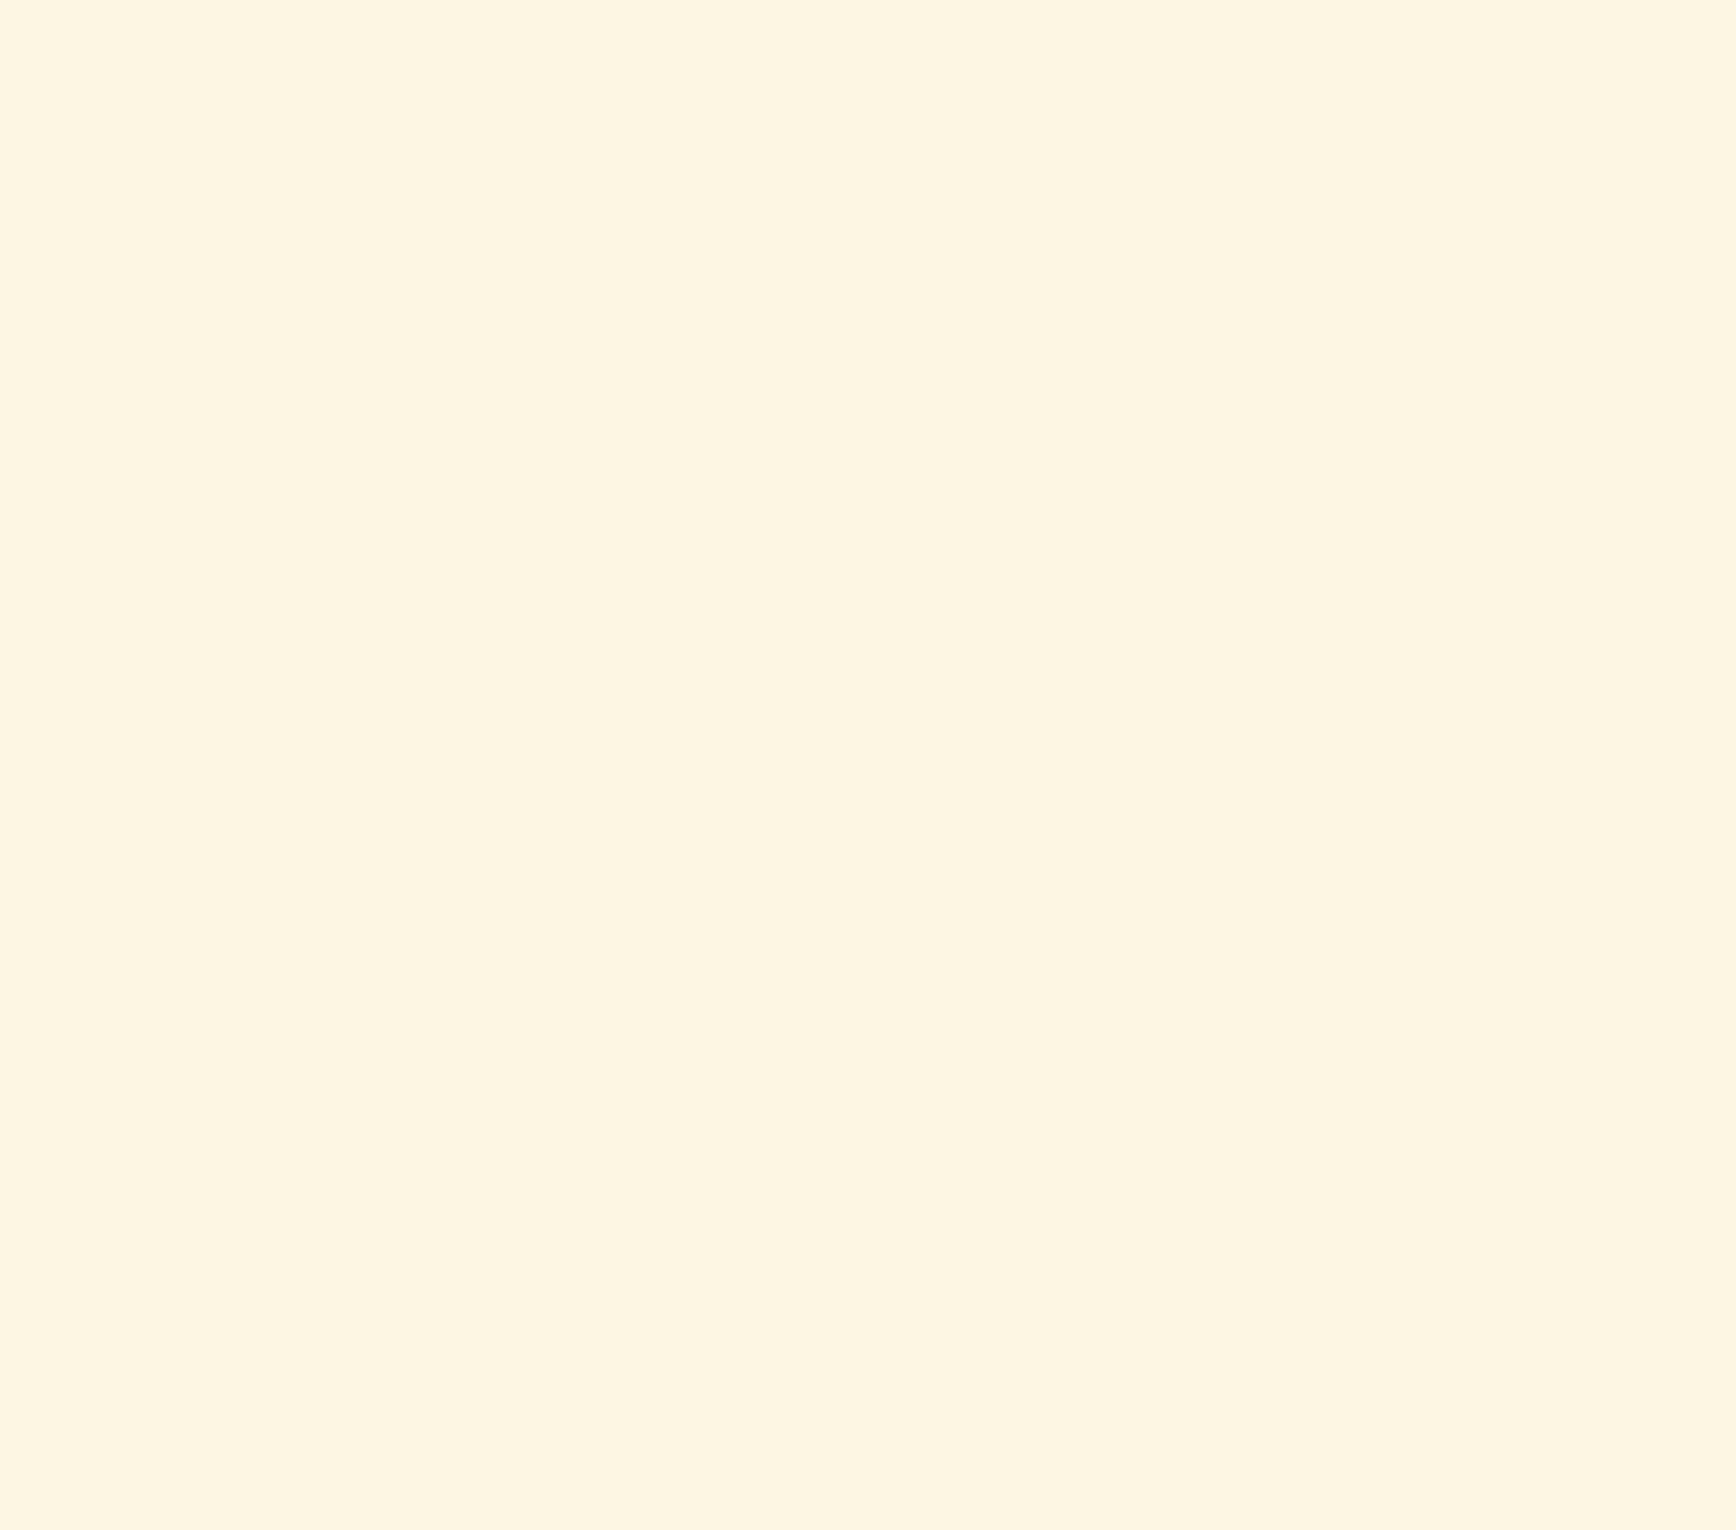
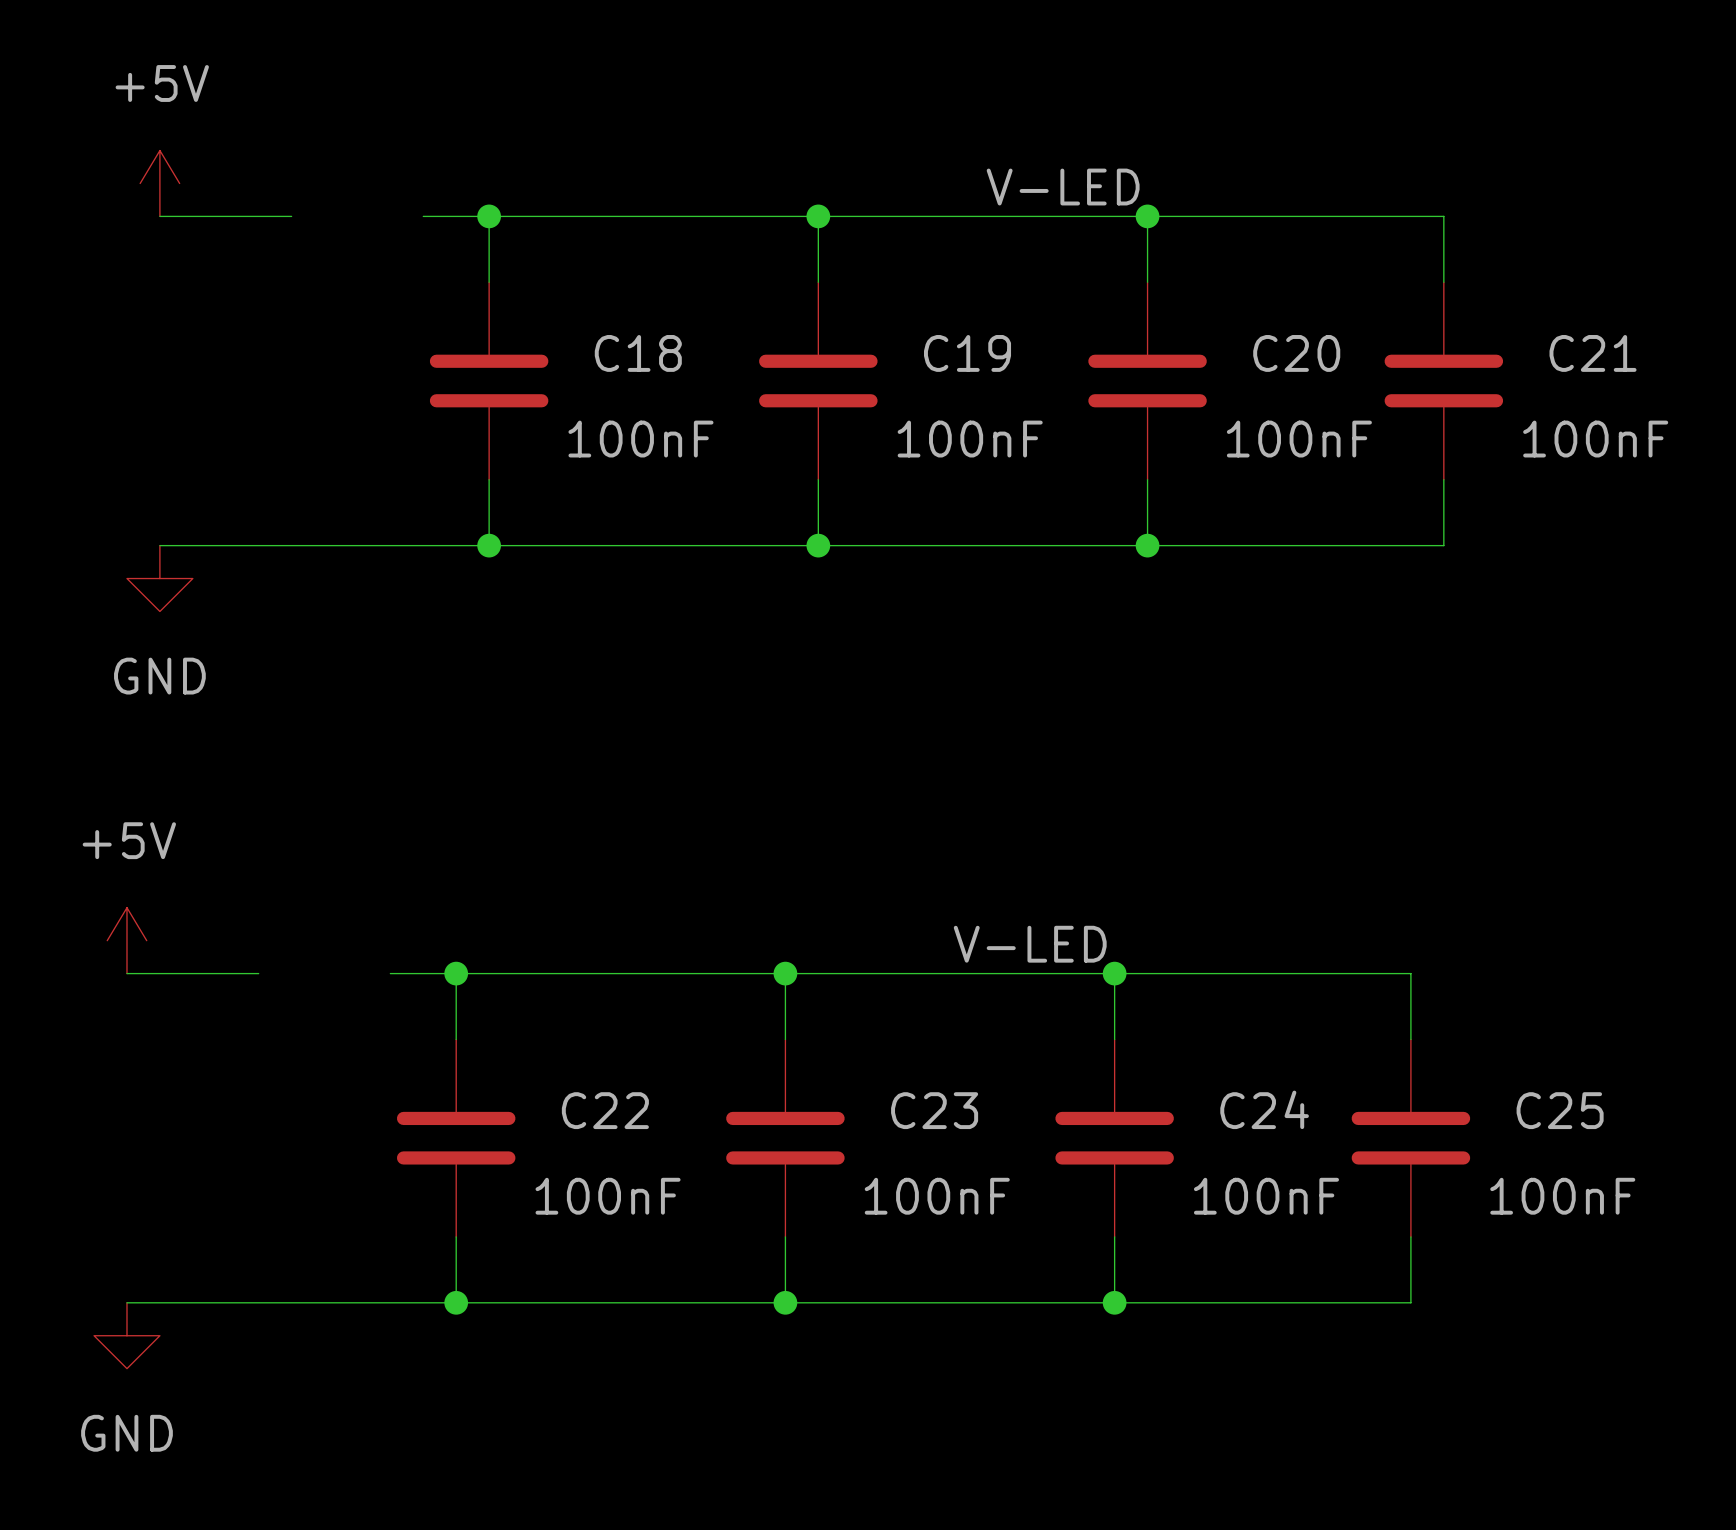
power symbol: none -> +5V (159, 183)
label: none -> V-LED (1063, 187)
wire: none -> (159, 216) (291, 216)
wire: none -> (423, 216) (1443, 216) (1443, 282)
wire: none -> (489, 216) (489, 282)
junction: none -> (489, 216)
wire: none -> (818, 216) (818, 282)
junction: none -> (818, 216)
wire: none -> (1147, 216) (1147, 282)
junction: none -> (1147, 216)
C18: none -> 100nF (489, 381)
C19: none -> 100nF (818, 381)
C20: none -> 100nF (1147, 381)
C21: none -> 100nF (1443, 381)
wire: none -> (489, 479) (489, 545)
wire: none -> (818, 479) (818, 545)
wire: none -> (1147, 479) (1147, 545)
wire: none -> (1443, 479) (1443, 545) (159, 545)
junction: none -> (489, 545)
junction: none -> (818, 545)
junction: none -> (1147, 545)
power symbol: none -> GND (159, 578)
power symbol: none -> +5V (126, 940)
label: none -> V-LED (1030, 944)
wire: none -> (126, 973) (258, 973)
wire: none -> (390, 973) (1410, 973) (1410, 1039)
wire: none -> (456, 973) (456, 1039)
junction: none -> (456, 973)
wire: none -> (785, 973) (785, 1039)
junction: none -> (785, 973)
wire: none -> (1114, 973) (1114, 1039)
junction: none -> (1114, 973)
C22: none -> 100nF (456, 1138)
C23: none -> 100nF (785, 1138)
C24: none -> 100nF (1114, 1138)
C25: none -> 100nF (1410, 1138)
wire: none -> (456, 1236) (456, 1302)
wire: none -> (785, 1236) (785, 1302)
wire: none -> (1114, 1236) (1114, 1302)
wire: none -> (1410, 1236) (1410, 1302) (126, 1302)
junction: none -> (456, 1302)
junction: none -> (785, 1302)
junction: none -> (1114, 1302)
power symbol: none -> GND (126, 1335)

